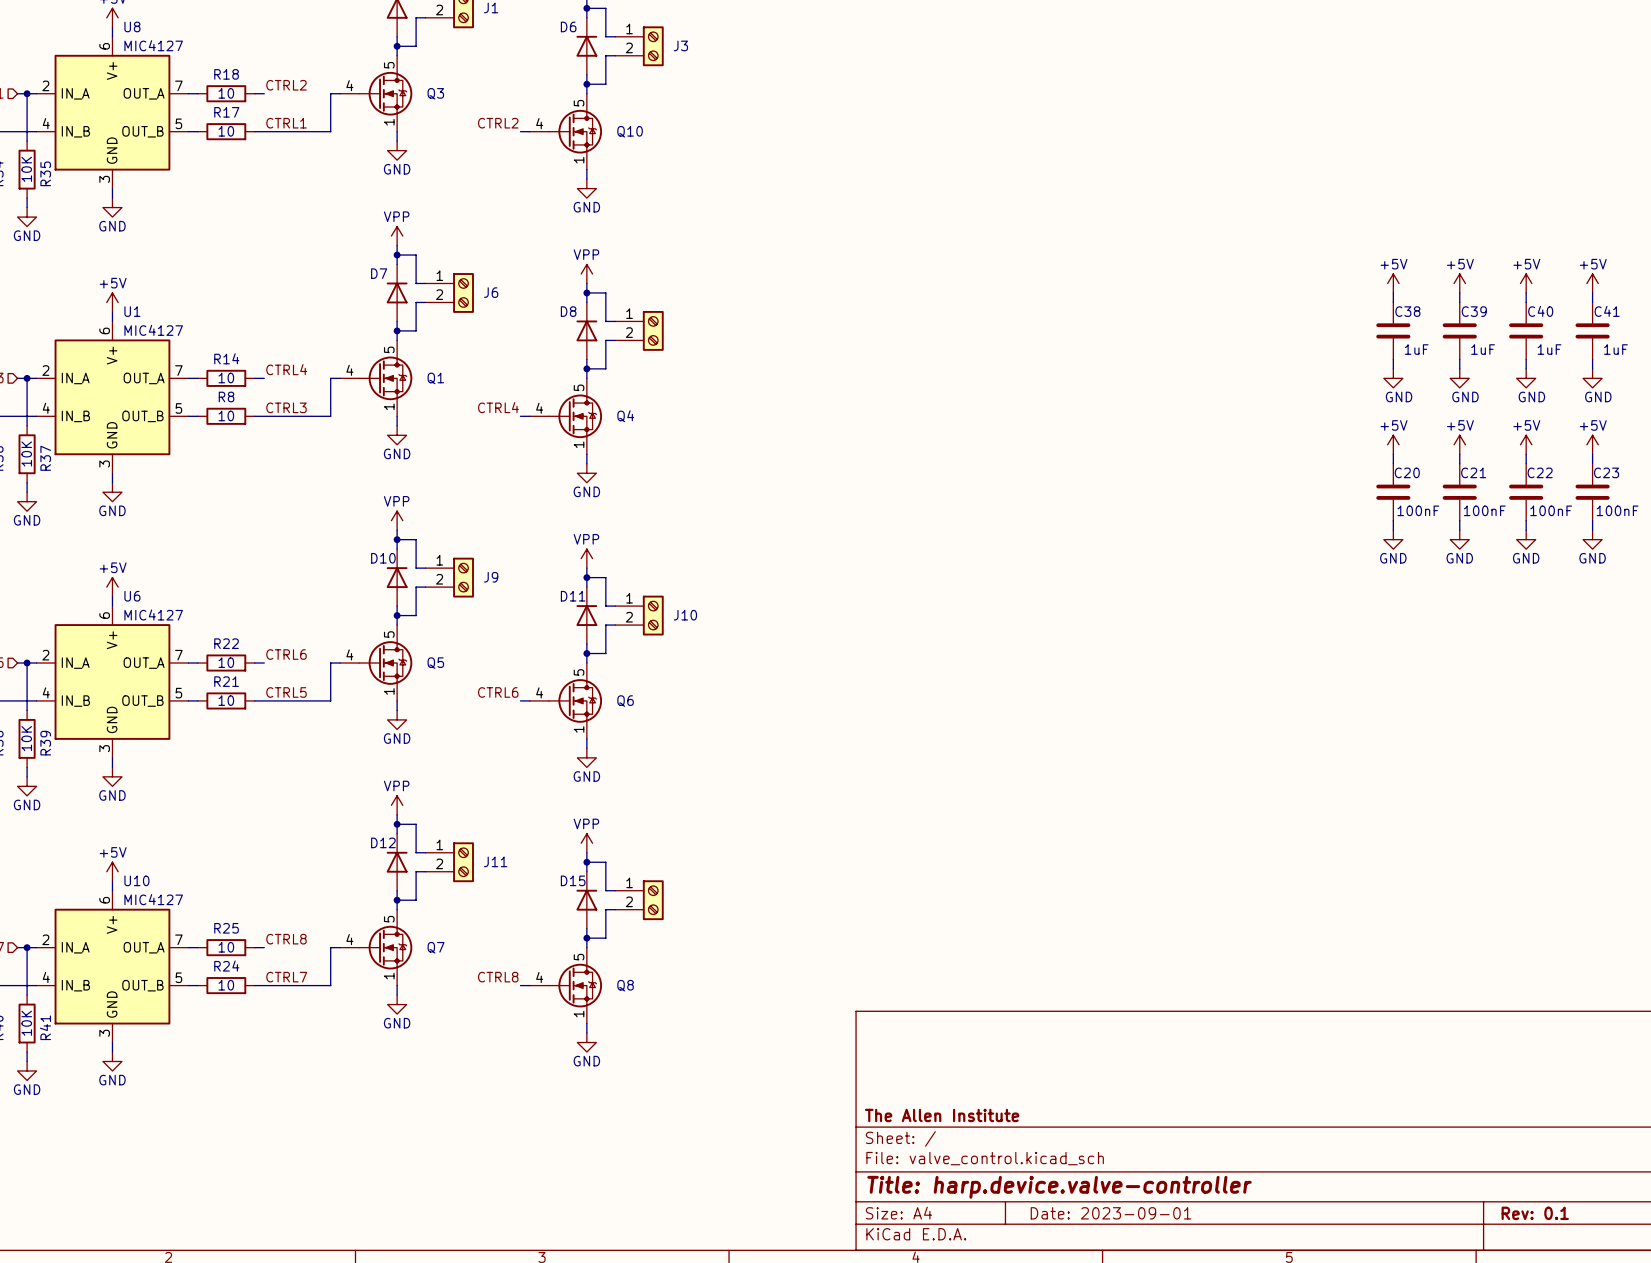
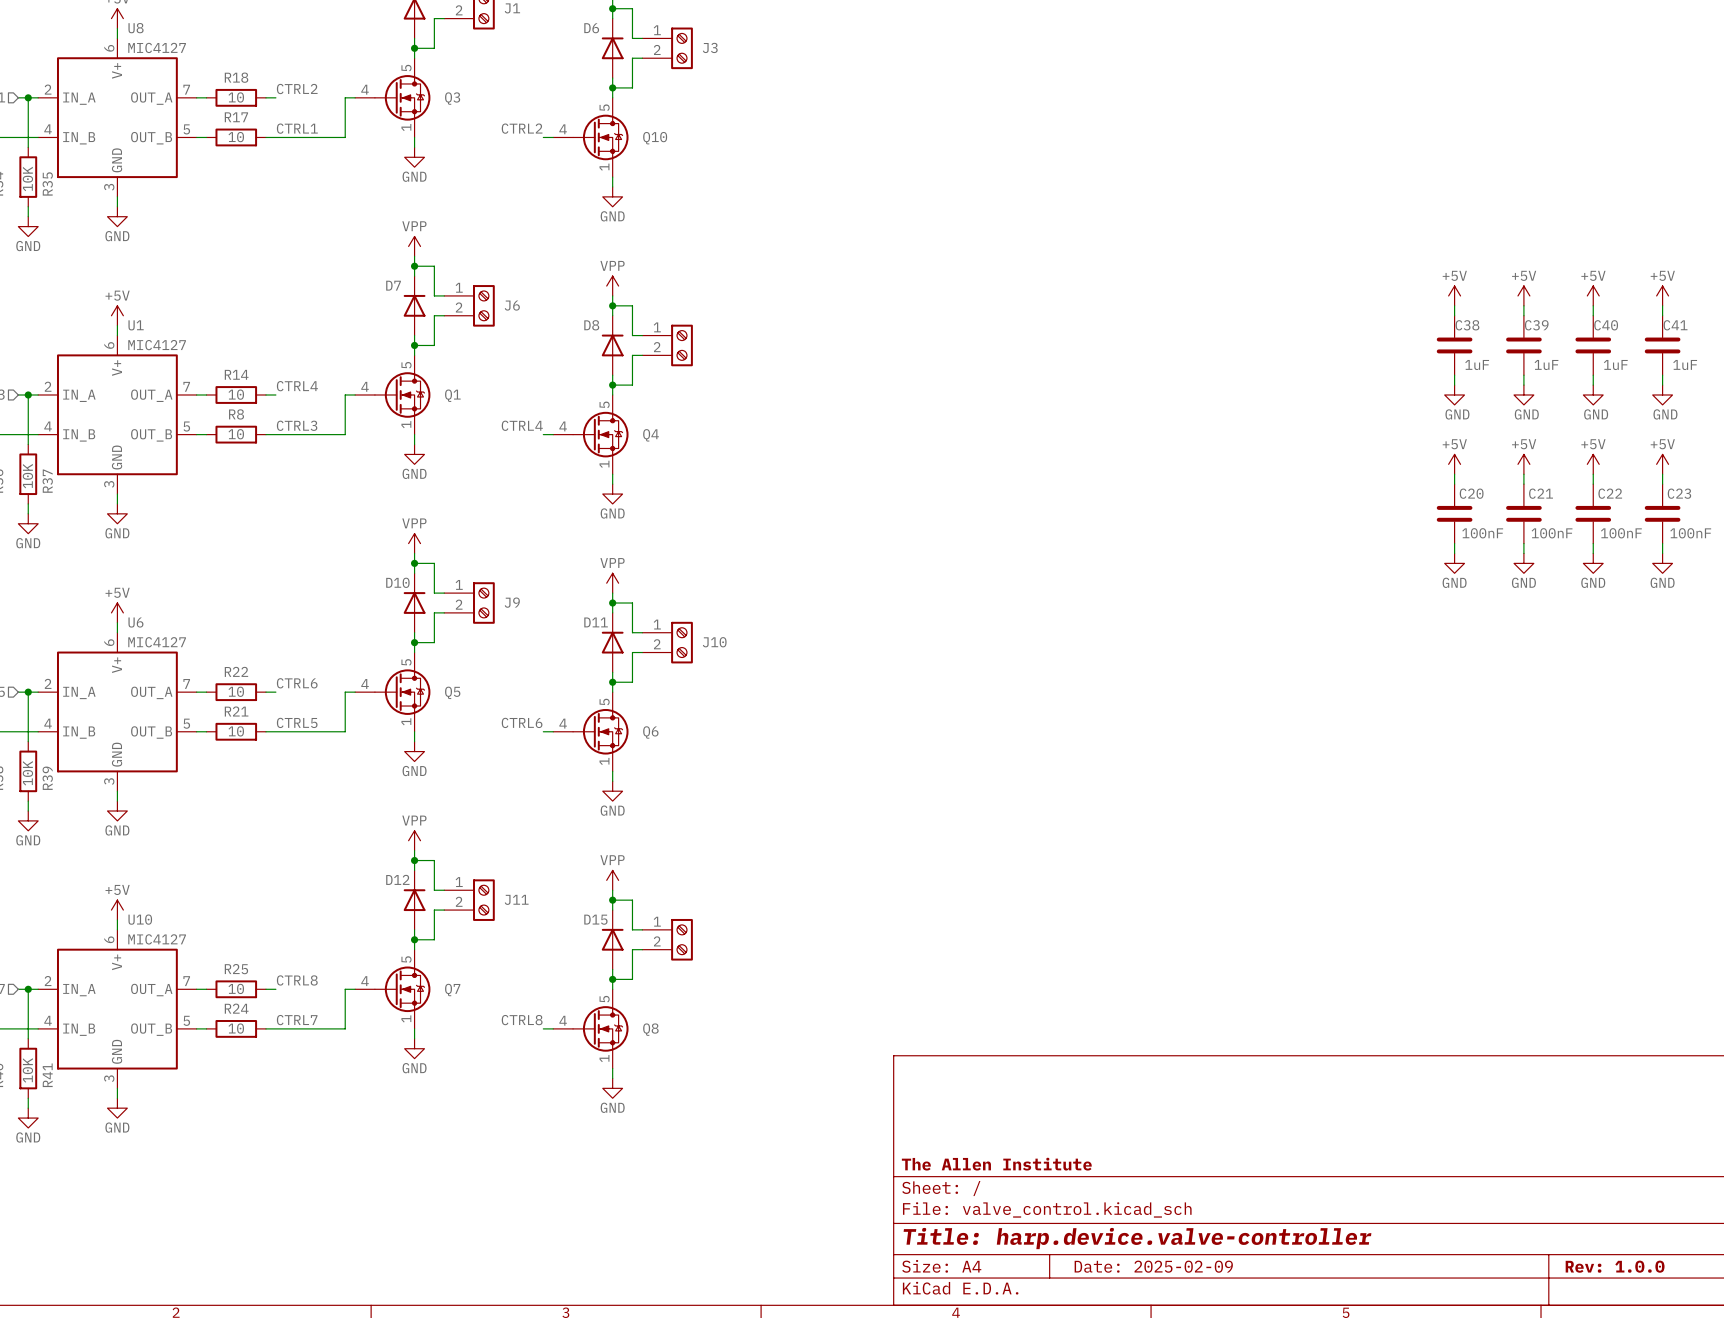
title block: Date: 2023-09-01 (1111, 1213) -> Date: 2025-02-09 (1153, 1266)
title block: Rev: 0.1 (1535, 1213) -> Rev: 1.0.0 (1615, 1266)

